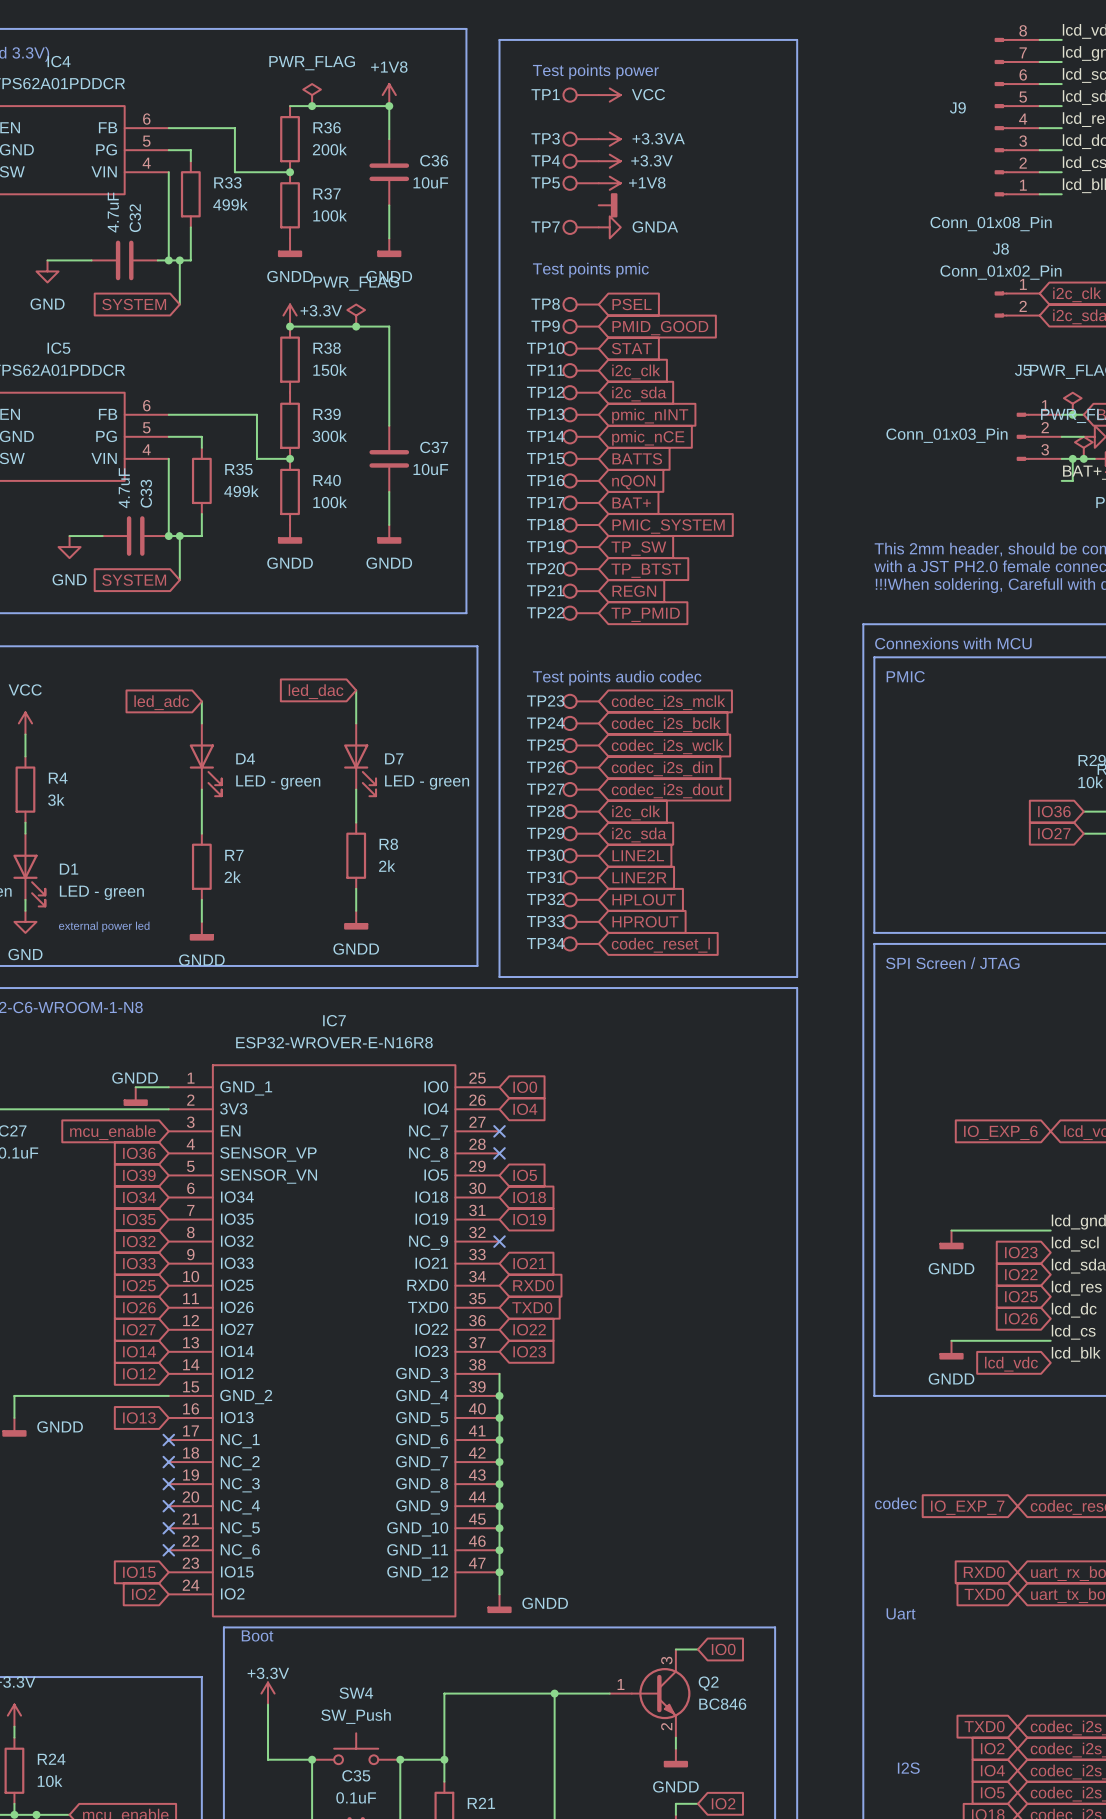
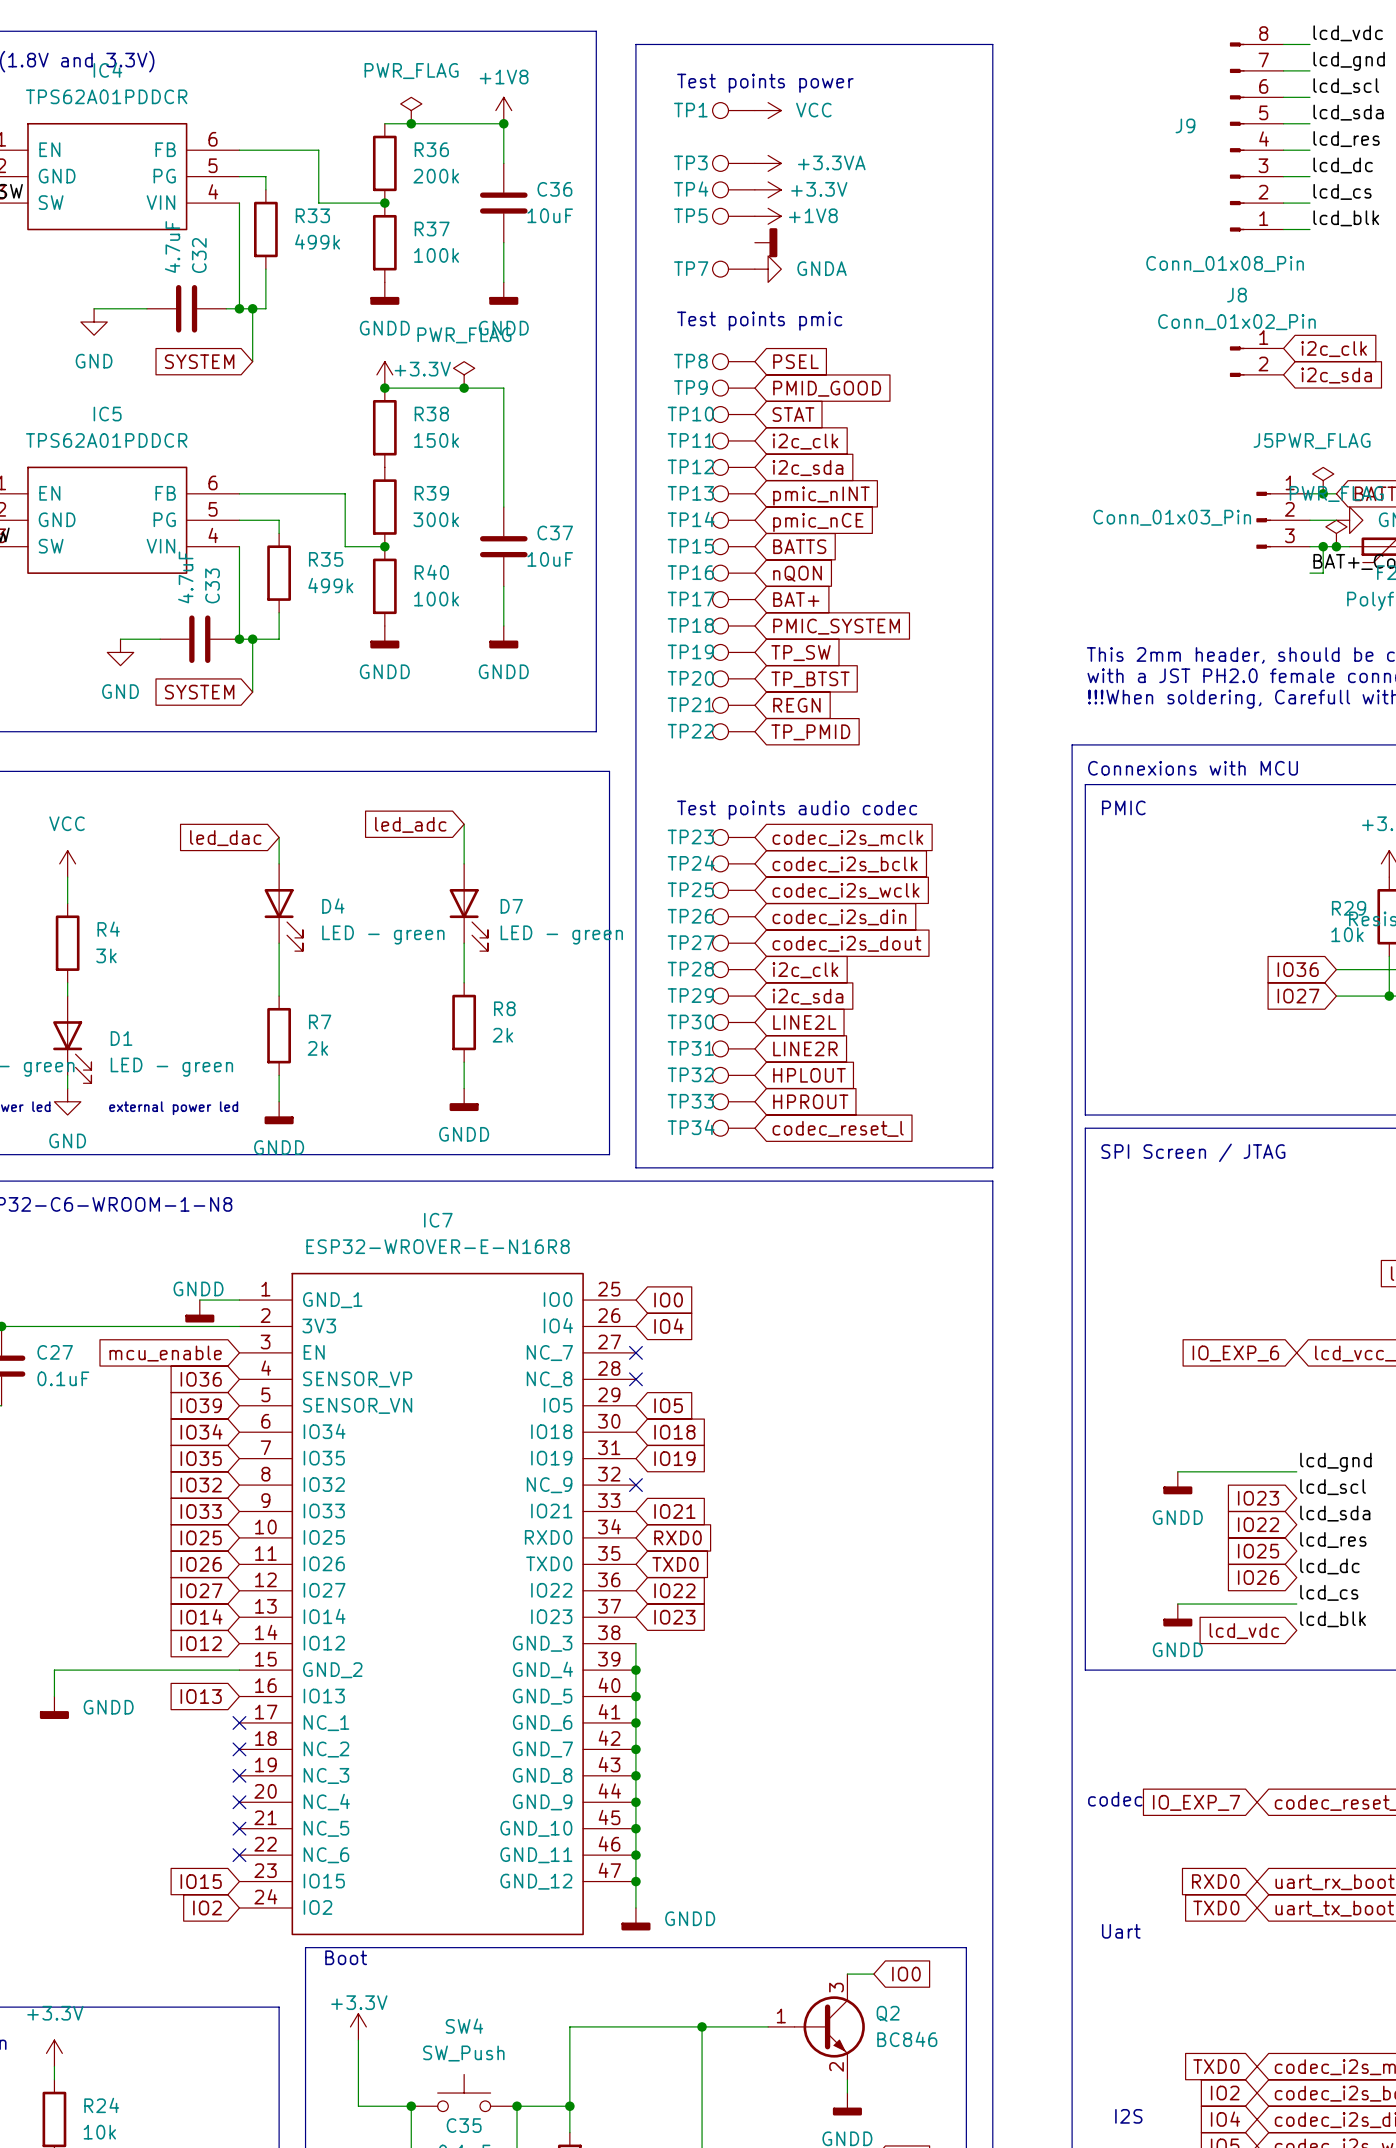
global label: led_dac (316, 691) -> led_adc (410, 824)
global label: led_adc (161, 702) -> led_dac (225, 838)

